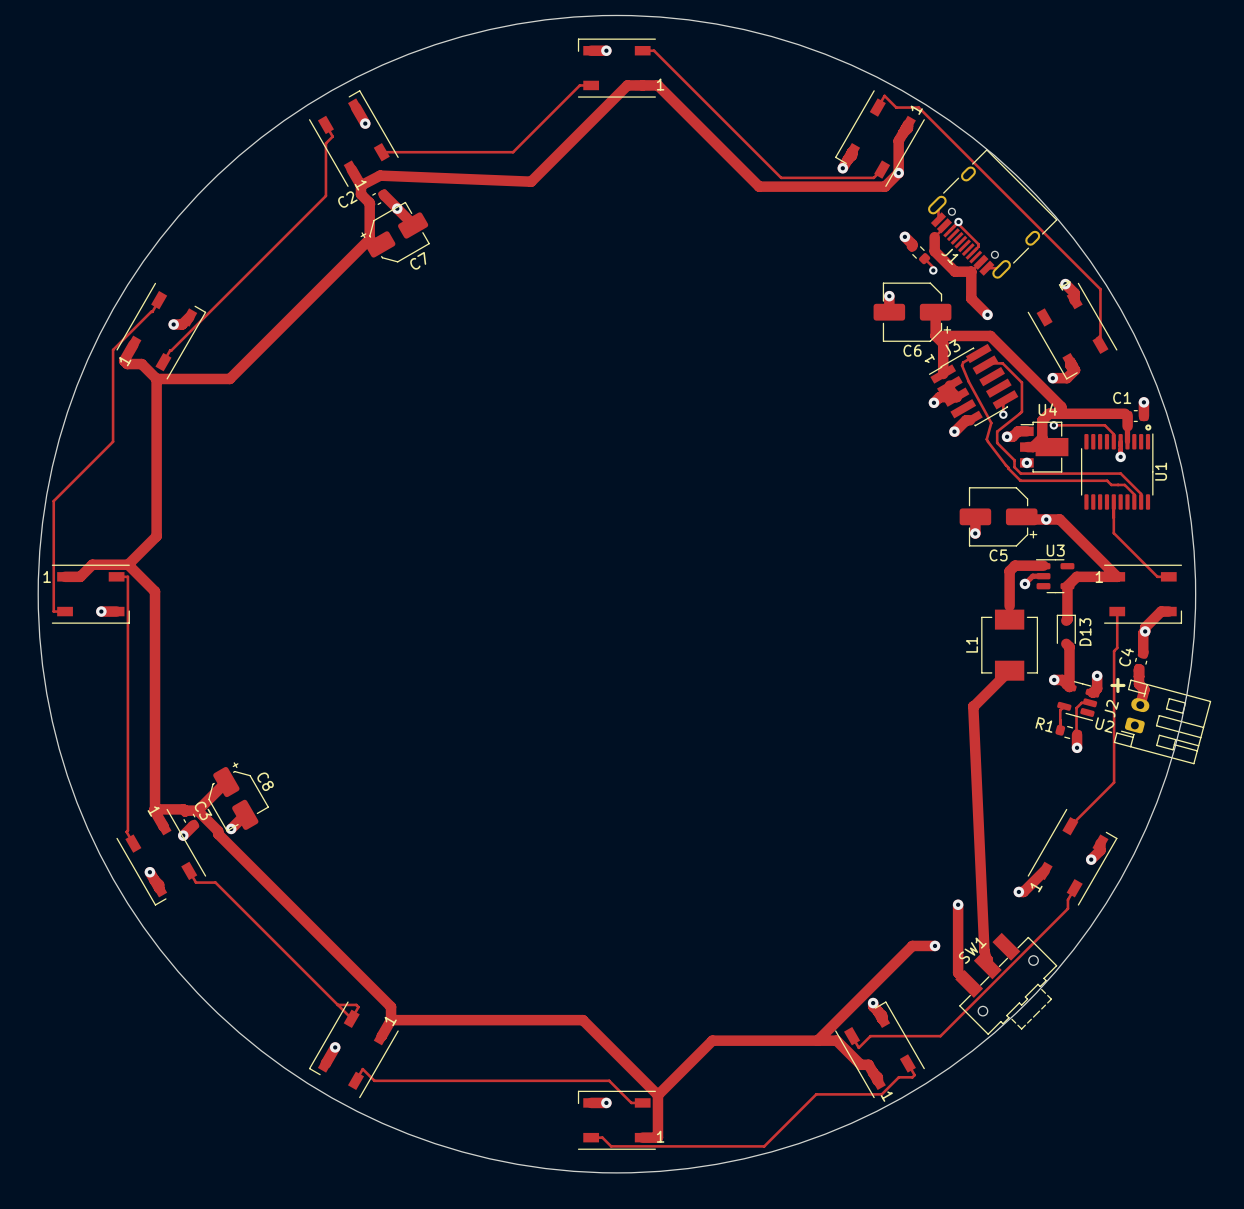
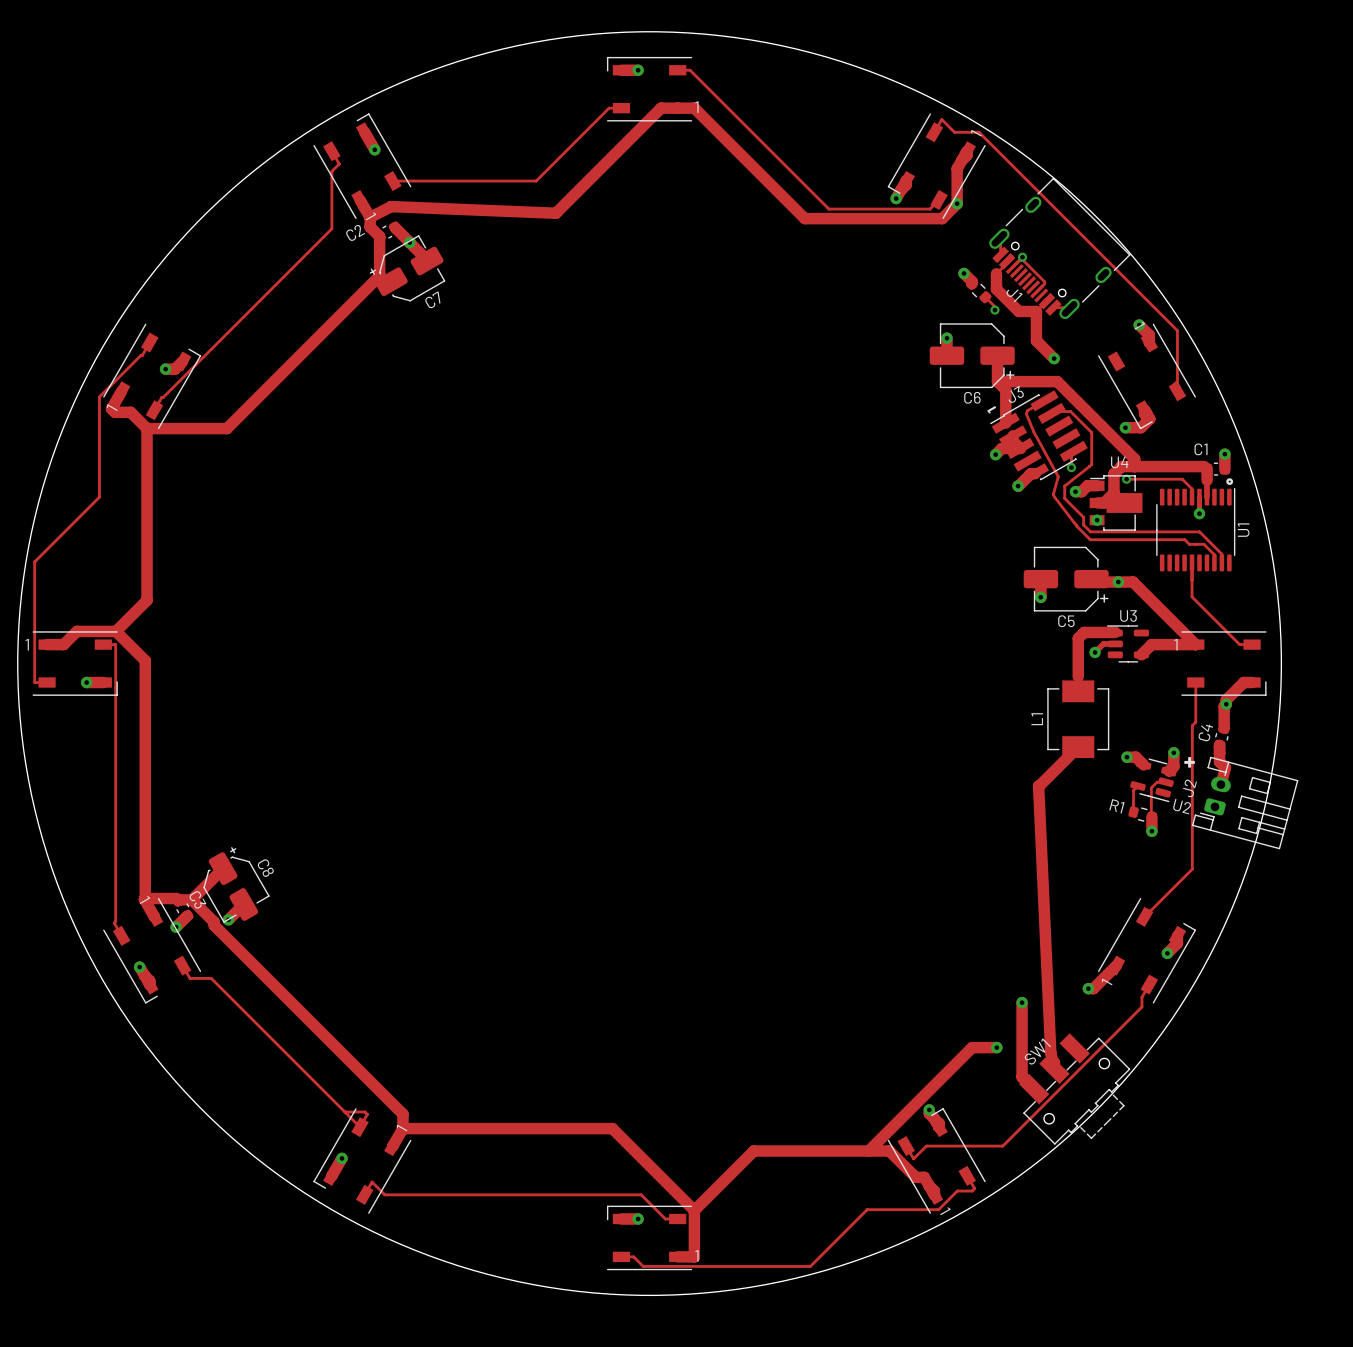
track: (1067, 586) (1066, 620) -> none
D13: (1066, 630) -> none
track: (1066, 643) (1069, 647) (1069, 686) -> none

